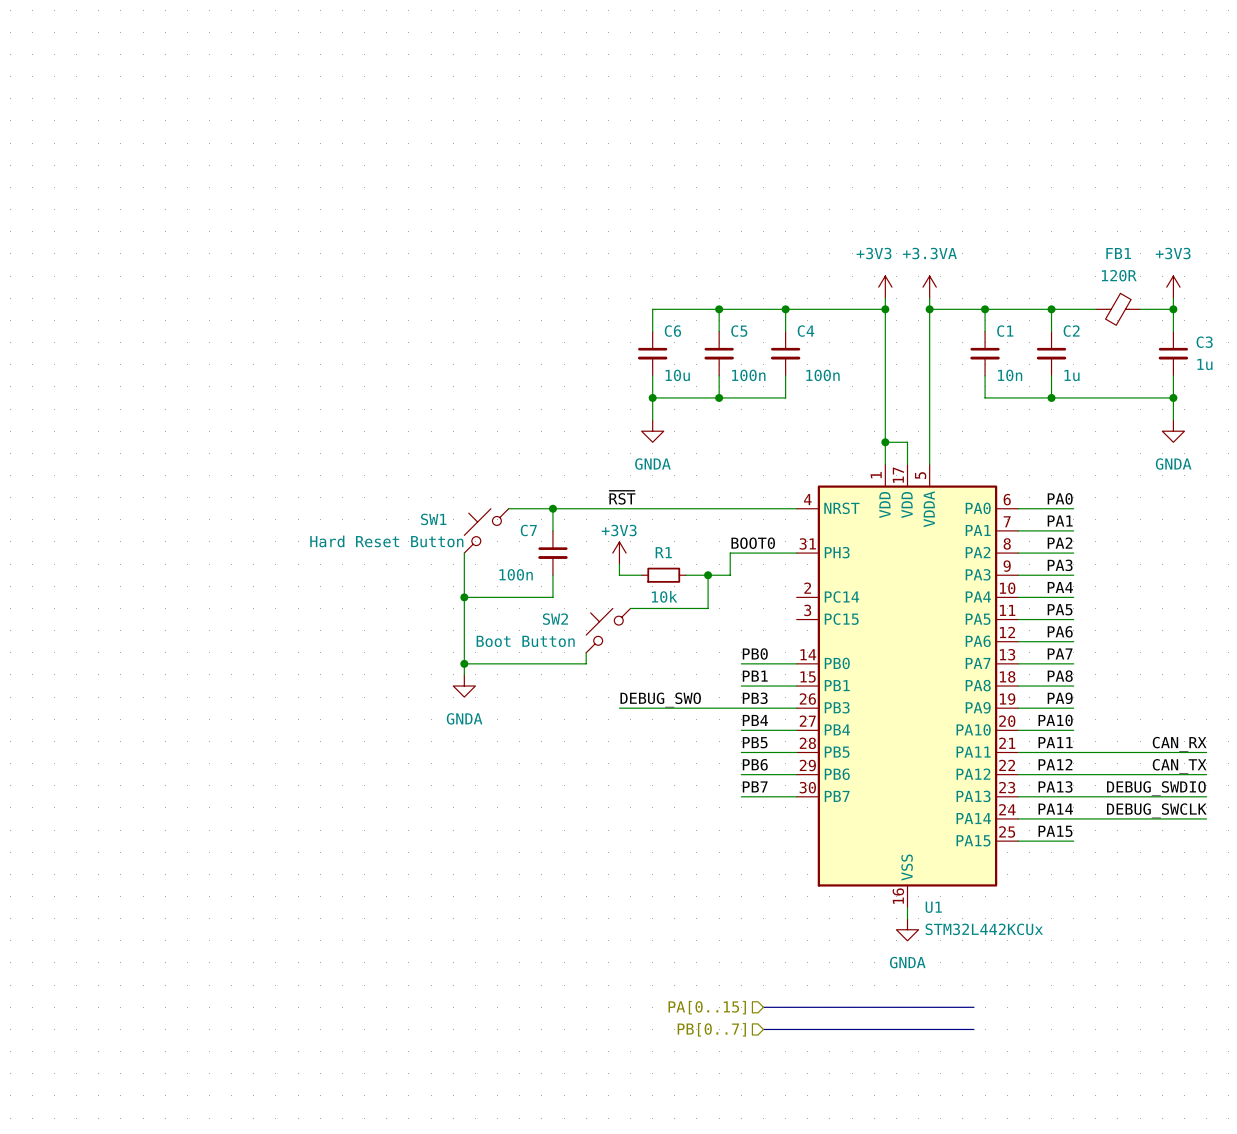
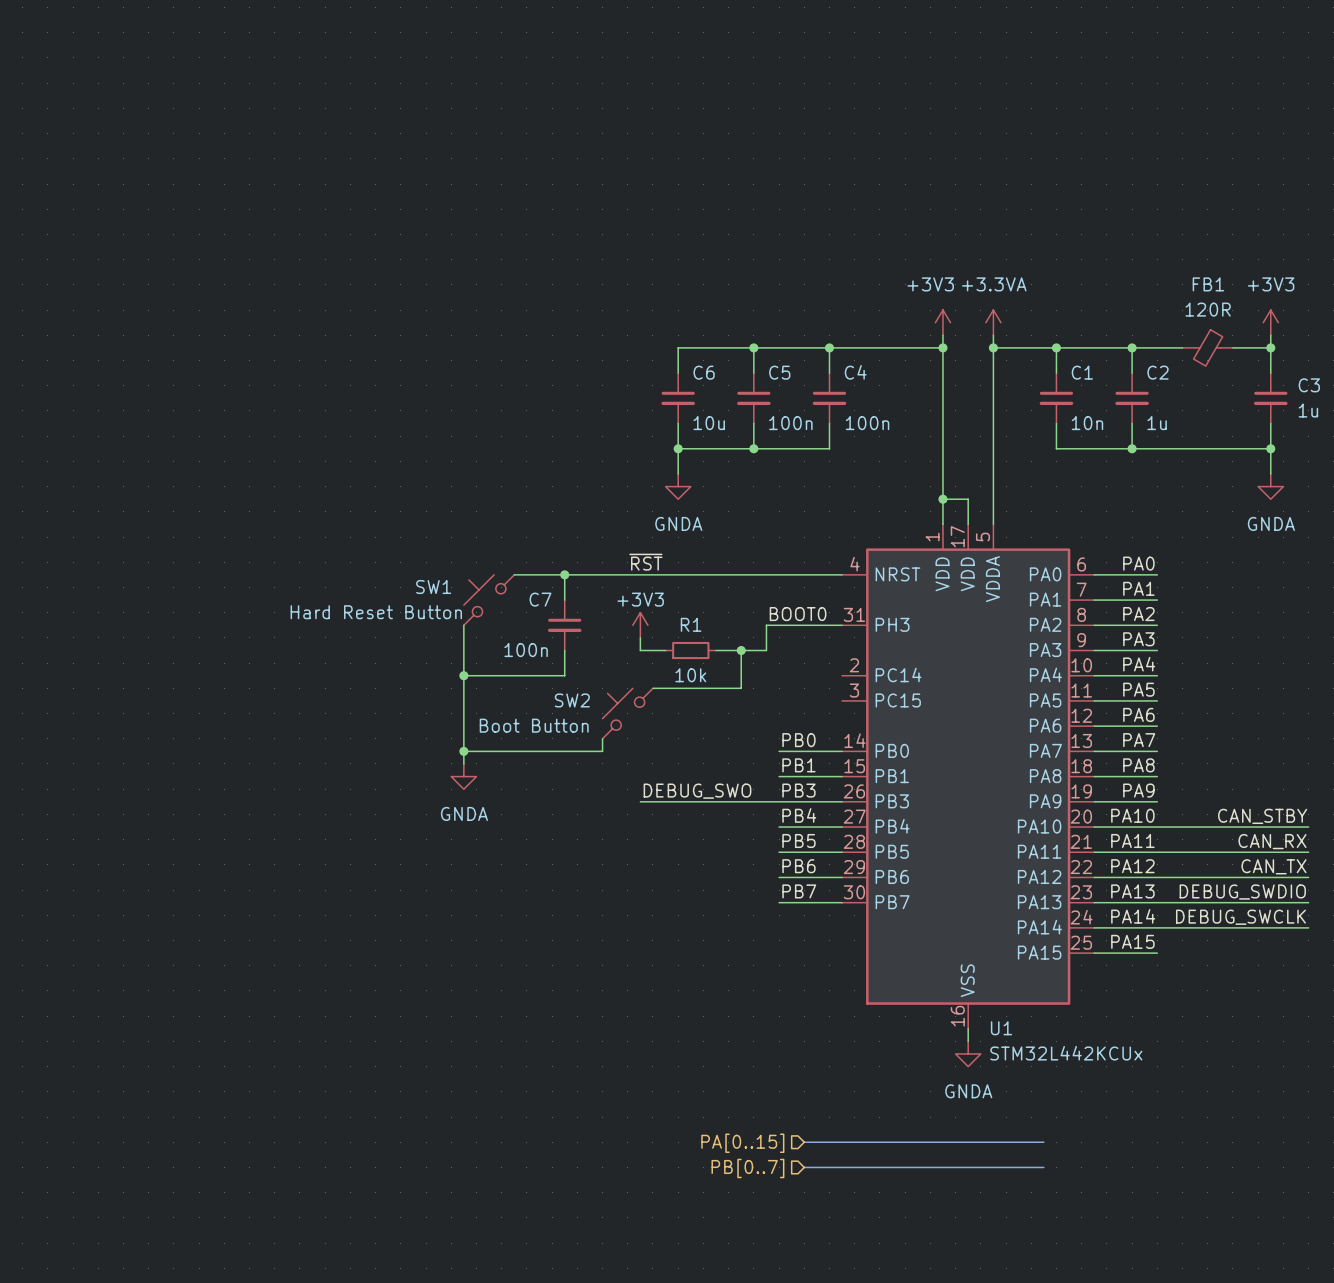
label: none -> CAN_STBY (1262, 816)
wire: none -> (1157, 827) (1308, 827)

